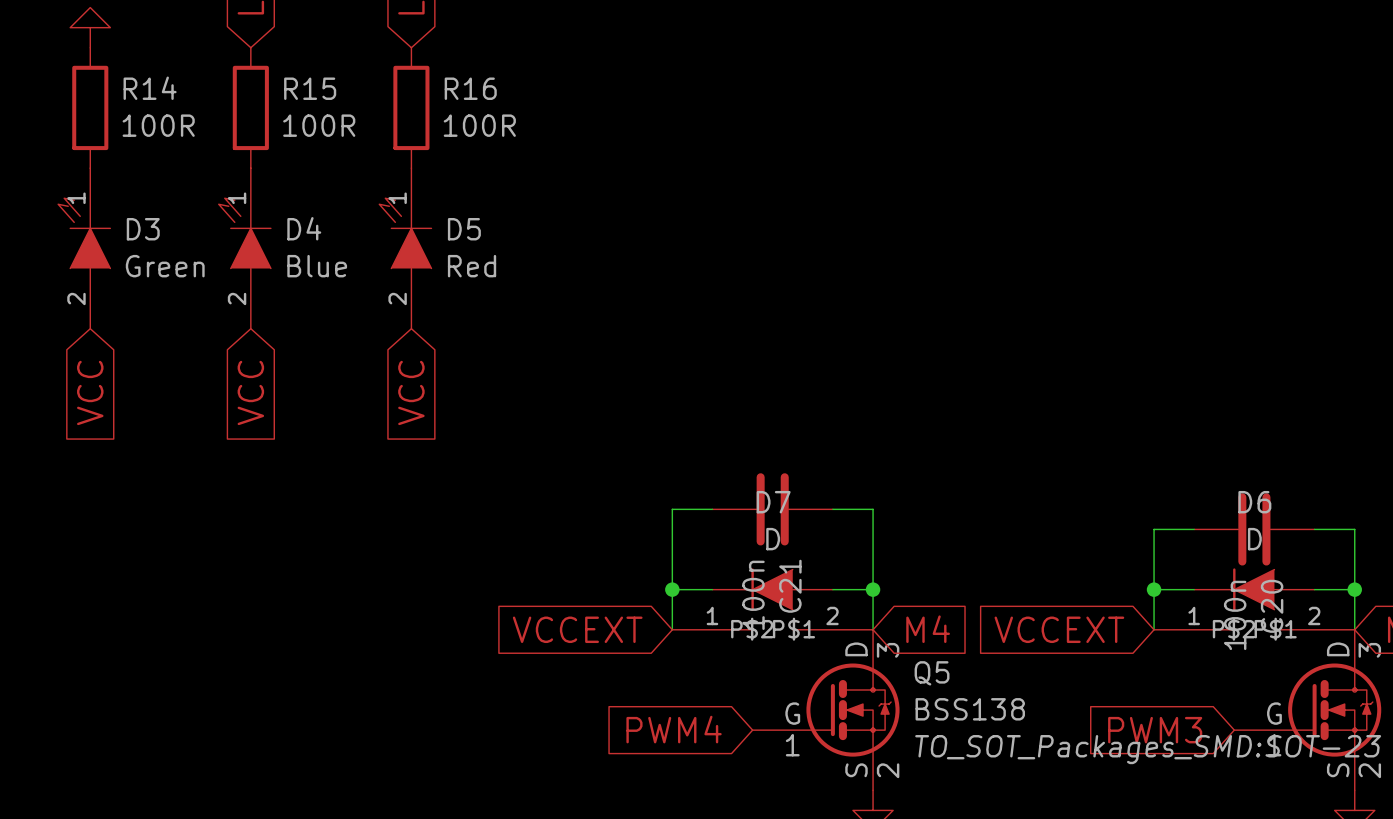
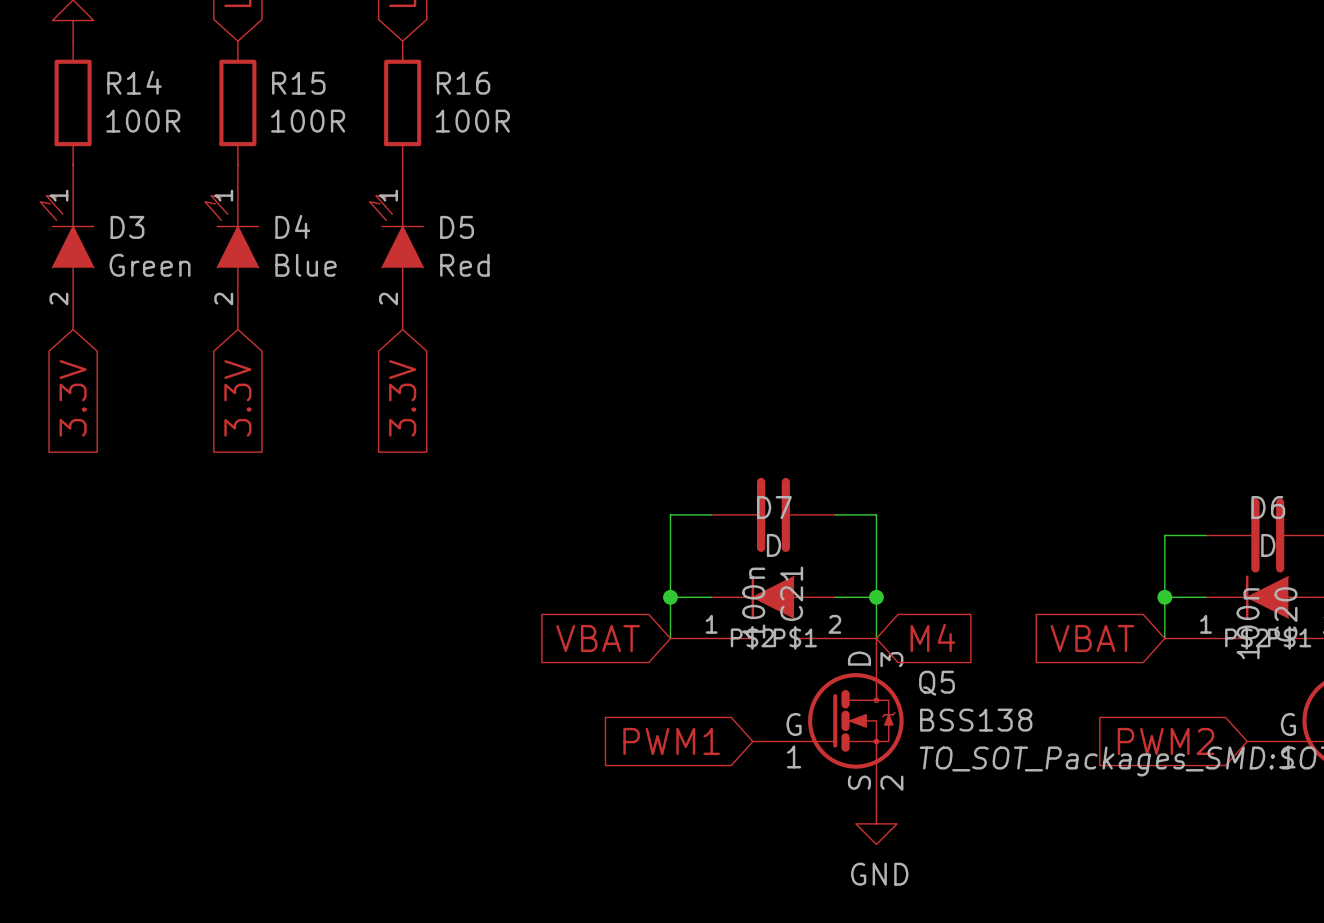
global label: VCC (90, 392) -> 3.3V (73, 398)
global label: VCC (250, 392) -> 3.3V (237, 398)
global label: VCC (411, 392) -> 3.3V (402, 398)
global label: VCCEXT (577, 629) -> VBAT (598, 638)
global label: VCCEXT (1059, 629) -> VBAT (1092, 638)
global label: PWM4 (674, 729) -> PWM1 (671, 741)
global label: PWM3 (1155, 730) -> PWM2 (1165, 741)

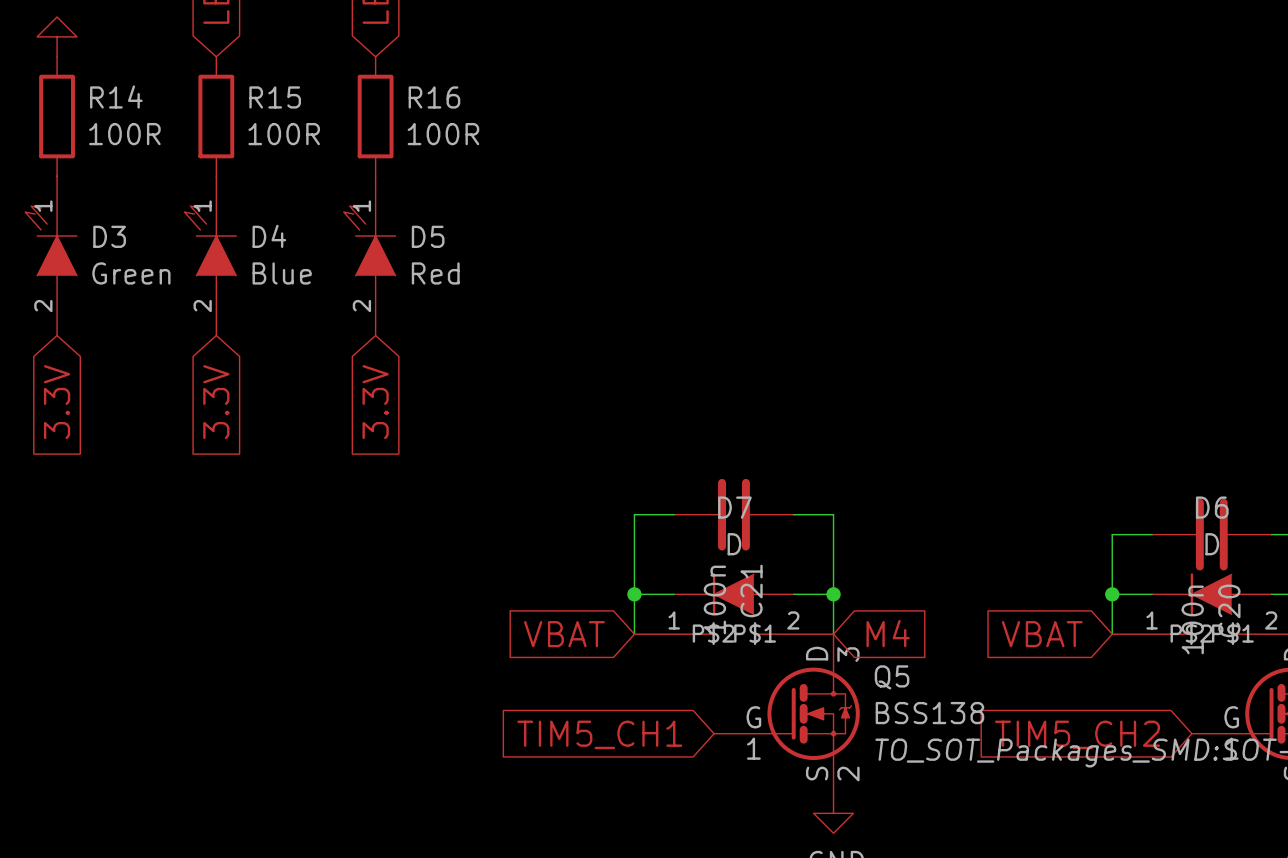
global label: PWM1 (671, 741) -> TIM5_CH1 (599, 734)
global label: PWM2 (1165, 741) -> TIM5_CH2 (1077, 734)

